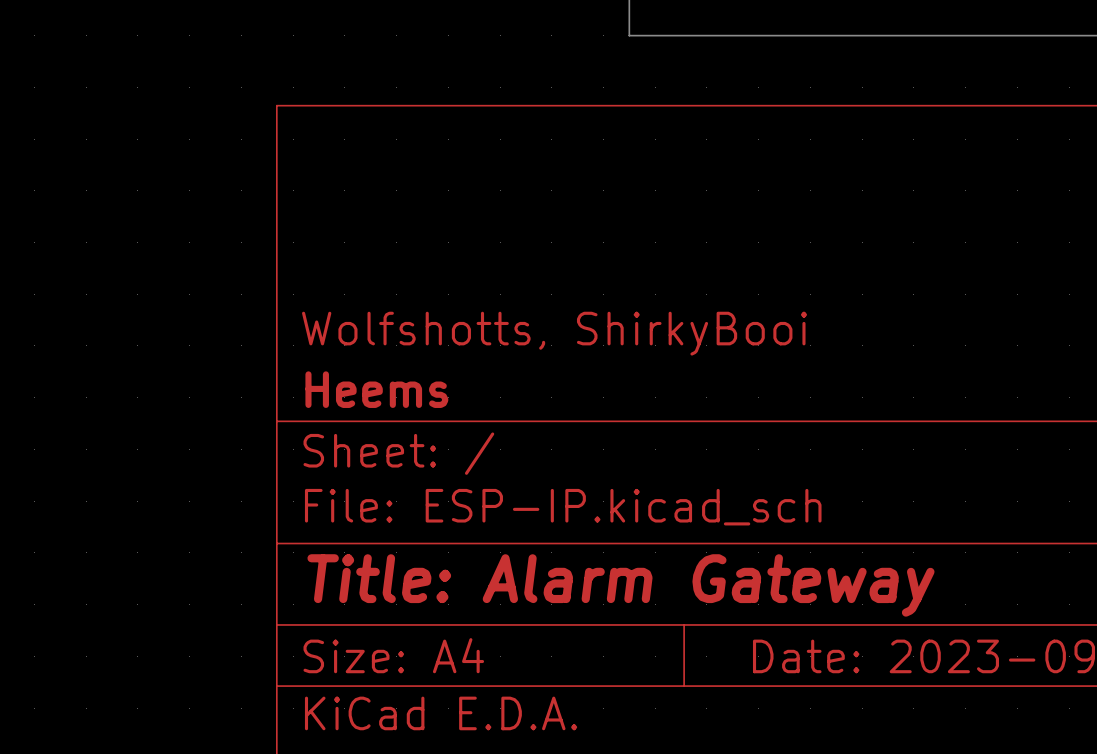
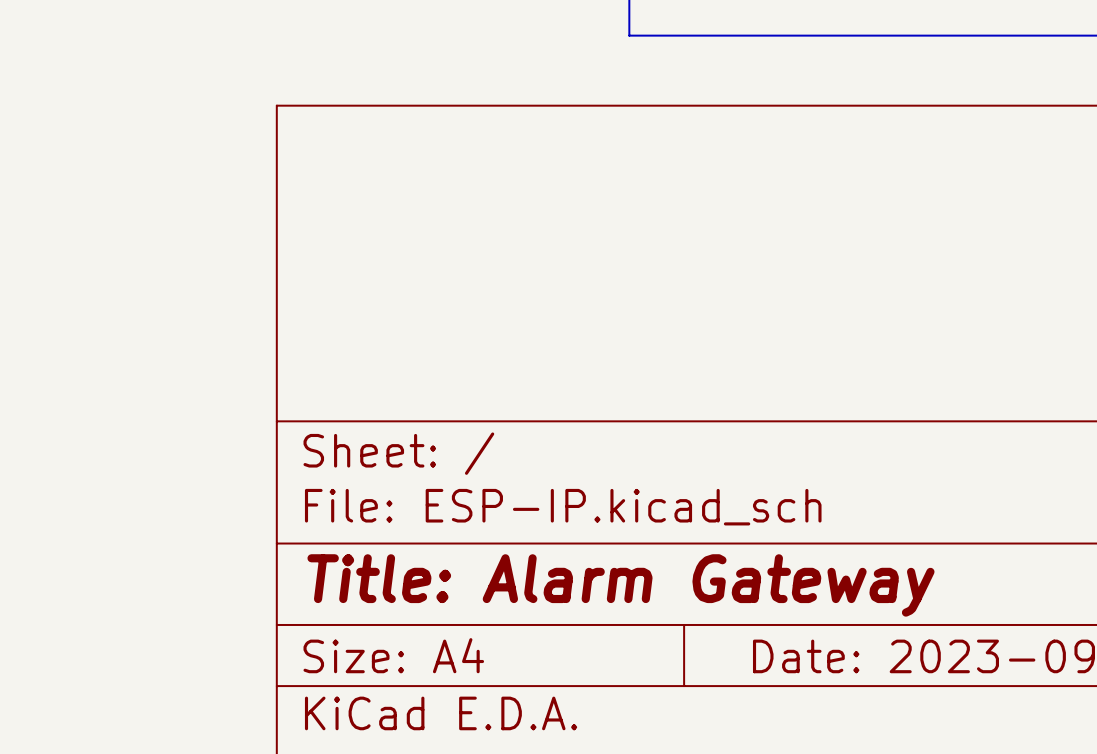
title block: Wolfshotts, ShirkyBooi (554, 333) -> none
title block: Heems (376, 389) -> none

